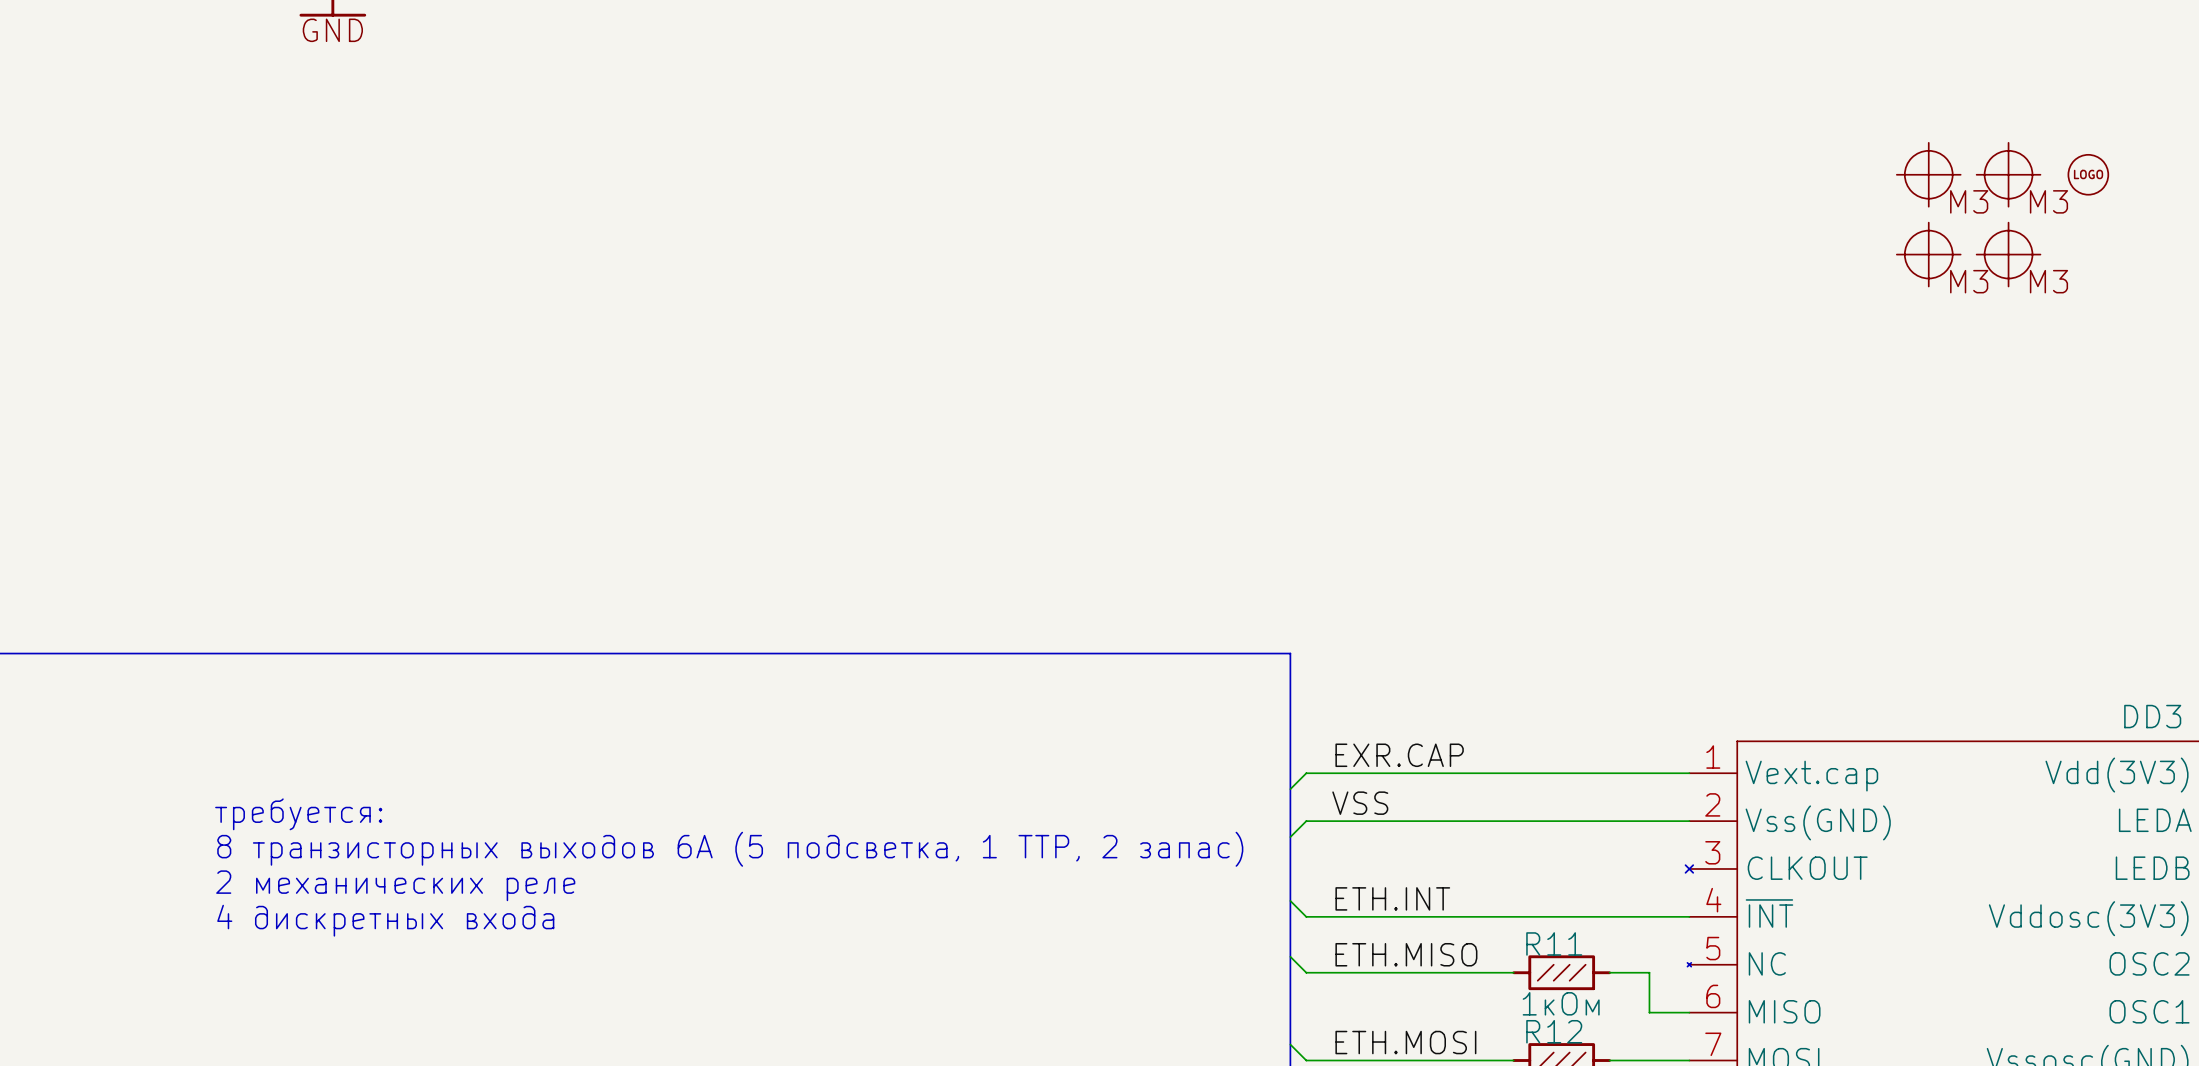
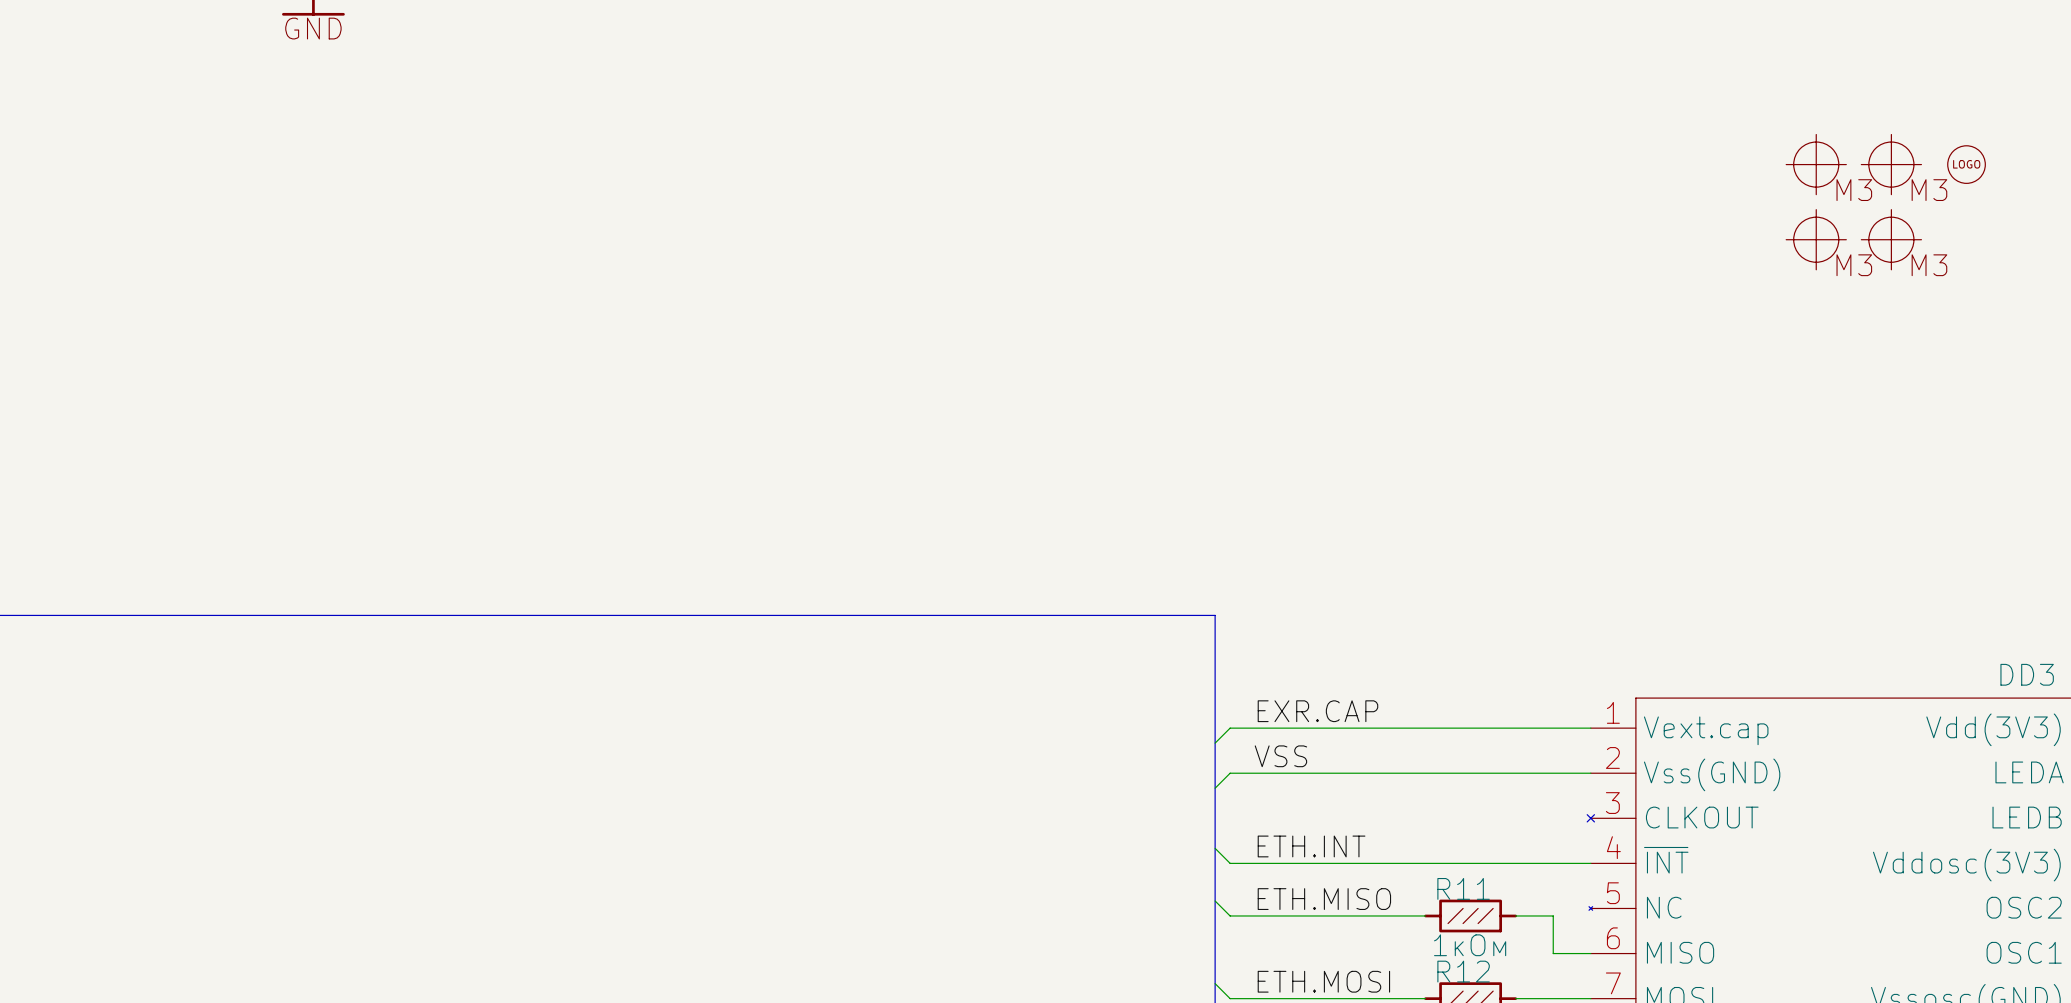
text: требуется: (298, 814) -> none
text: 8 транзисторных выходов 6А (5 подсветка, 1 ТТР, 2 запас) (730, 849) -> none
text: 2 механических реле (395, 885) -> none
text: 4 дискретных входа (385, 920) -> none

